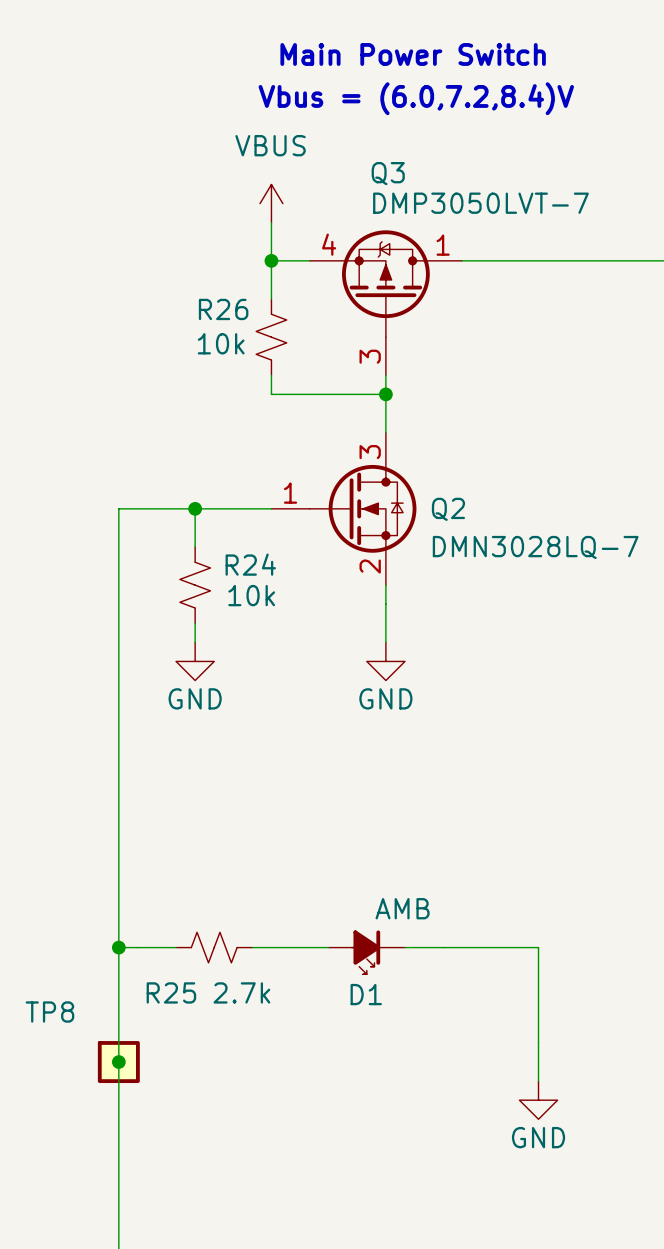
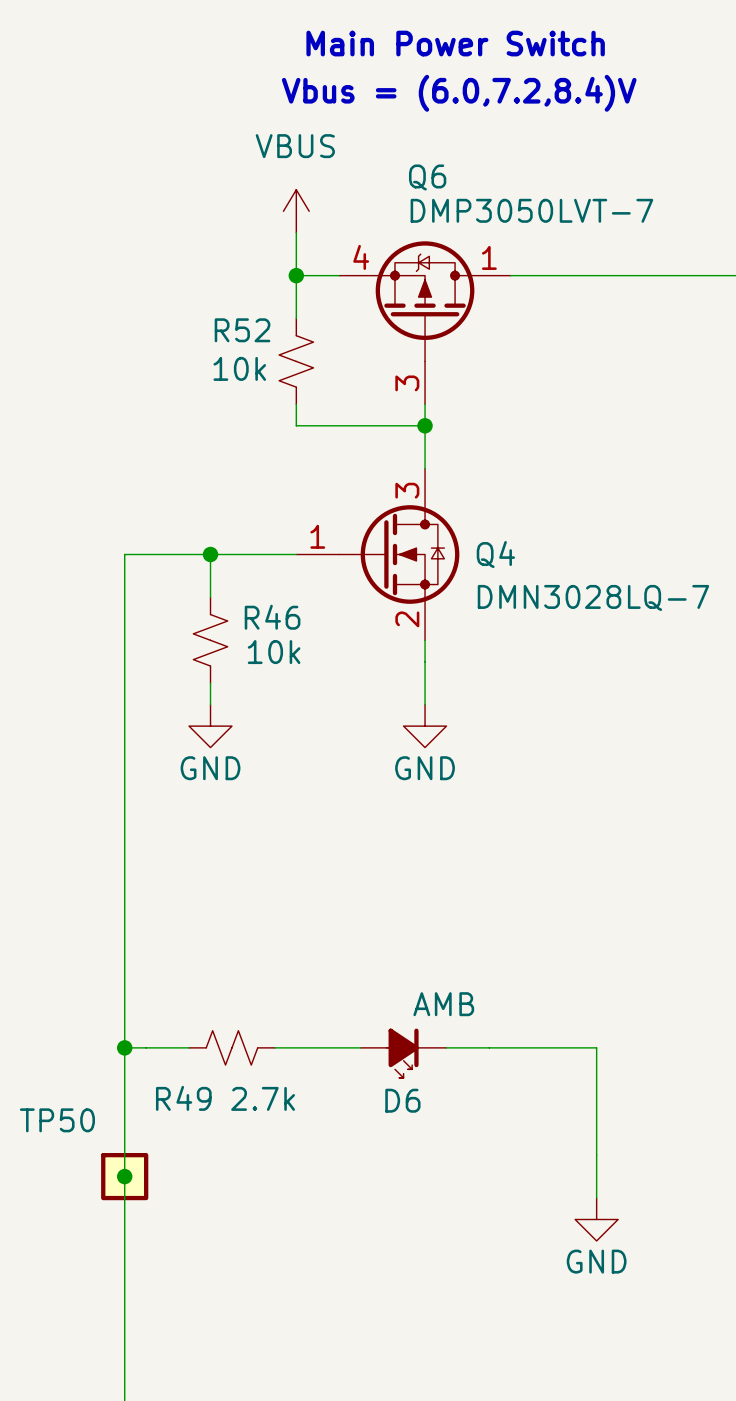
Q3 name: Q3 (388, 173) -> Q6 (427, 177)
R26 name: R26 (223, 309) -> R52 (242, 330)
Q2 name: Q2 (448, 509) -> Q4 (495, 554)
R24 name: R24 (250, 564) -> R46 (272, 617)
R25 name: R25 (171, 992) -> R49 (183, 1098)
D1 name: D1 (366, 994) -> D6 (402, 1100)
TP8 name: TP8 (49, 1012) -> TP50 (57, 1120)

